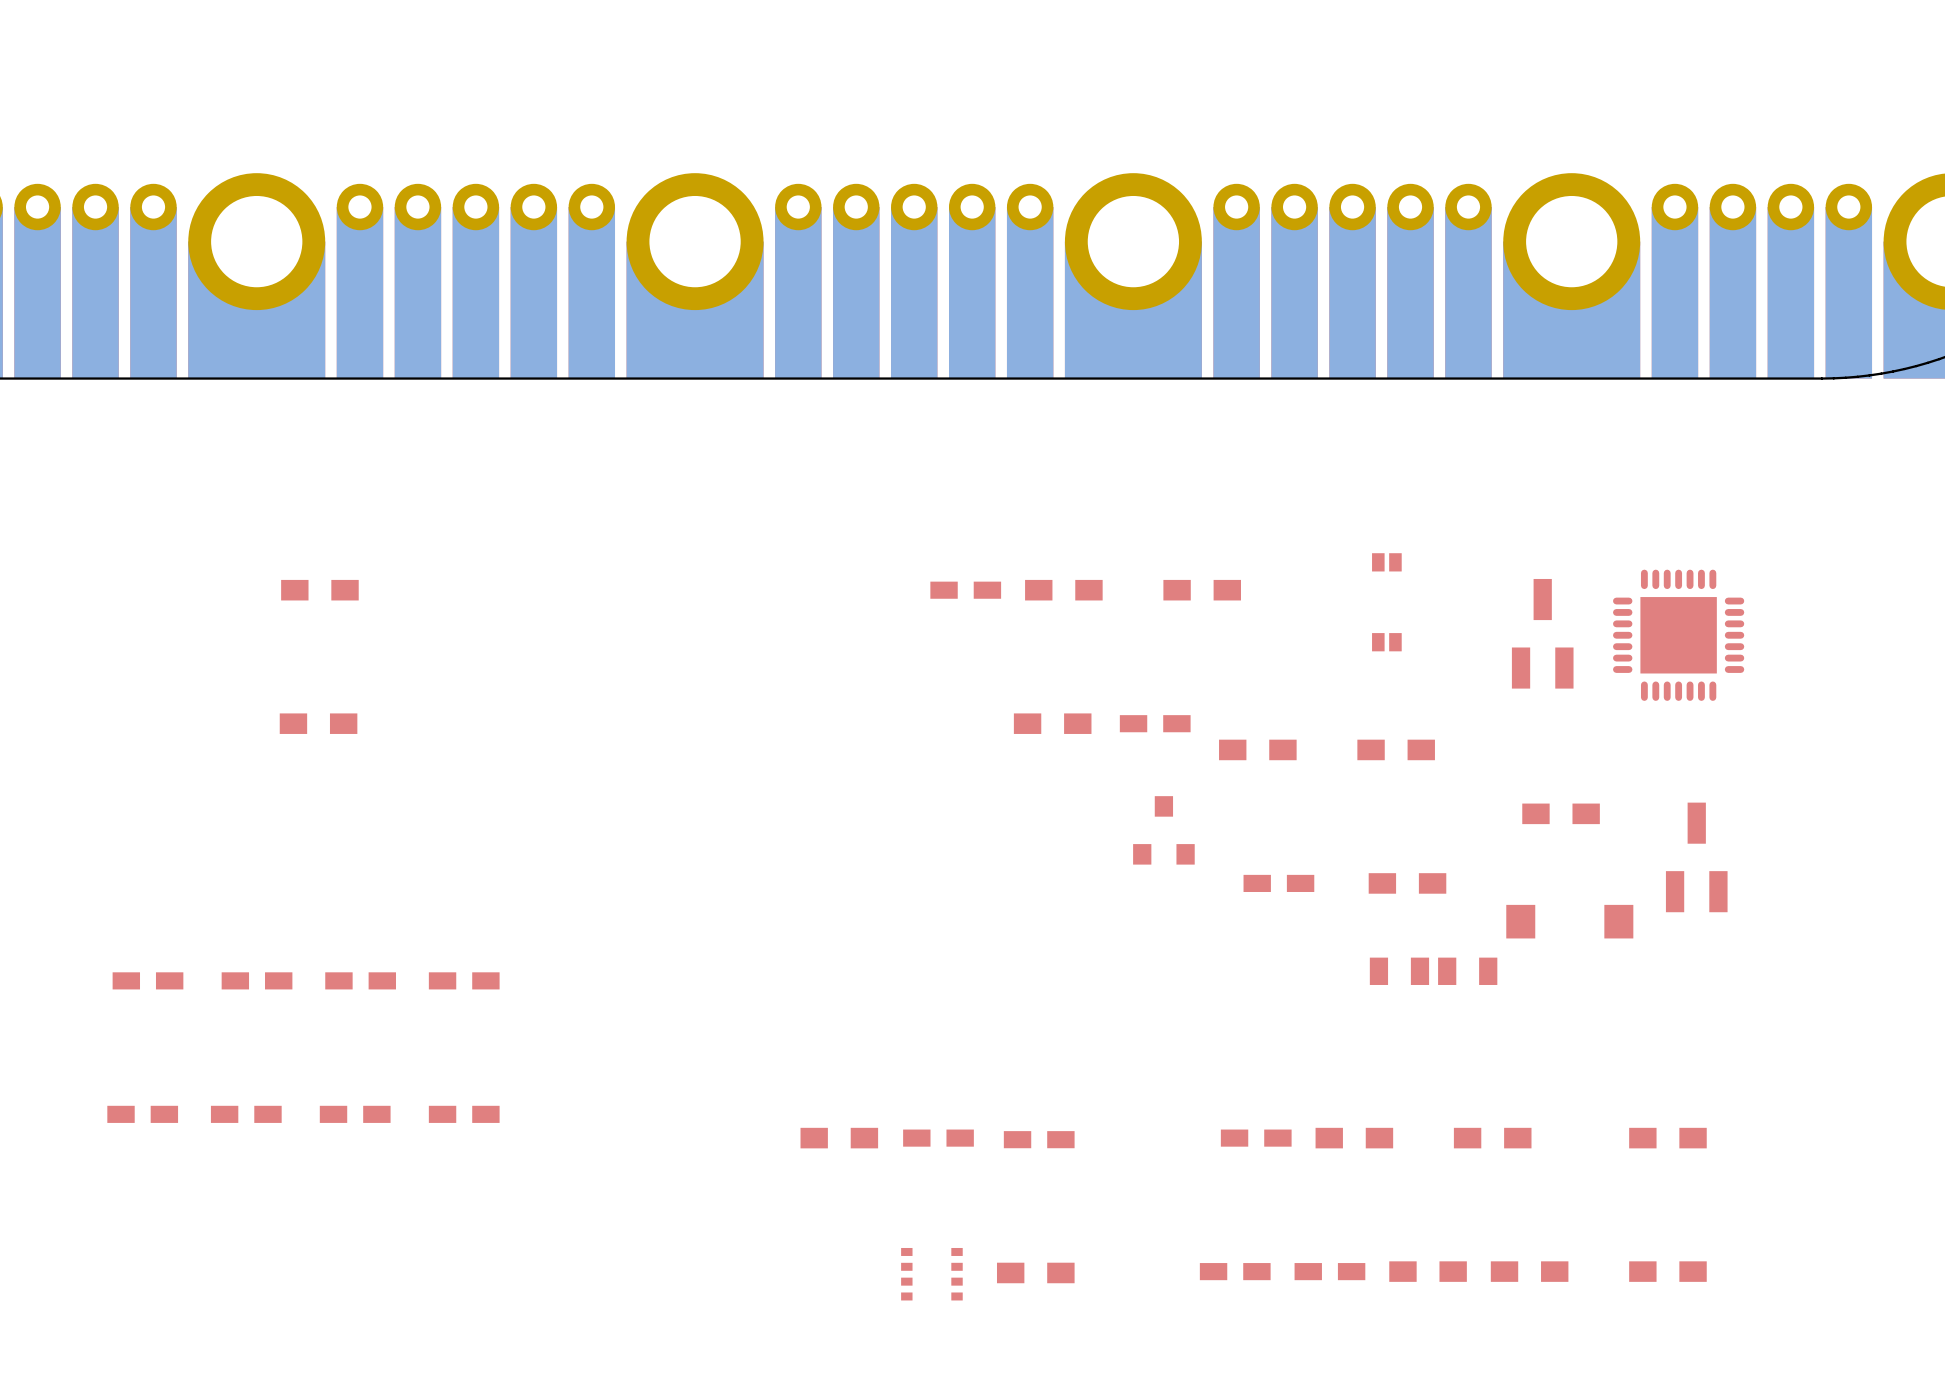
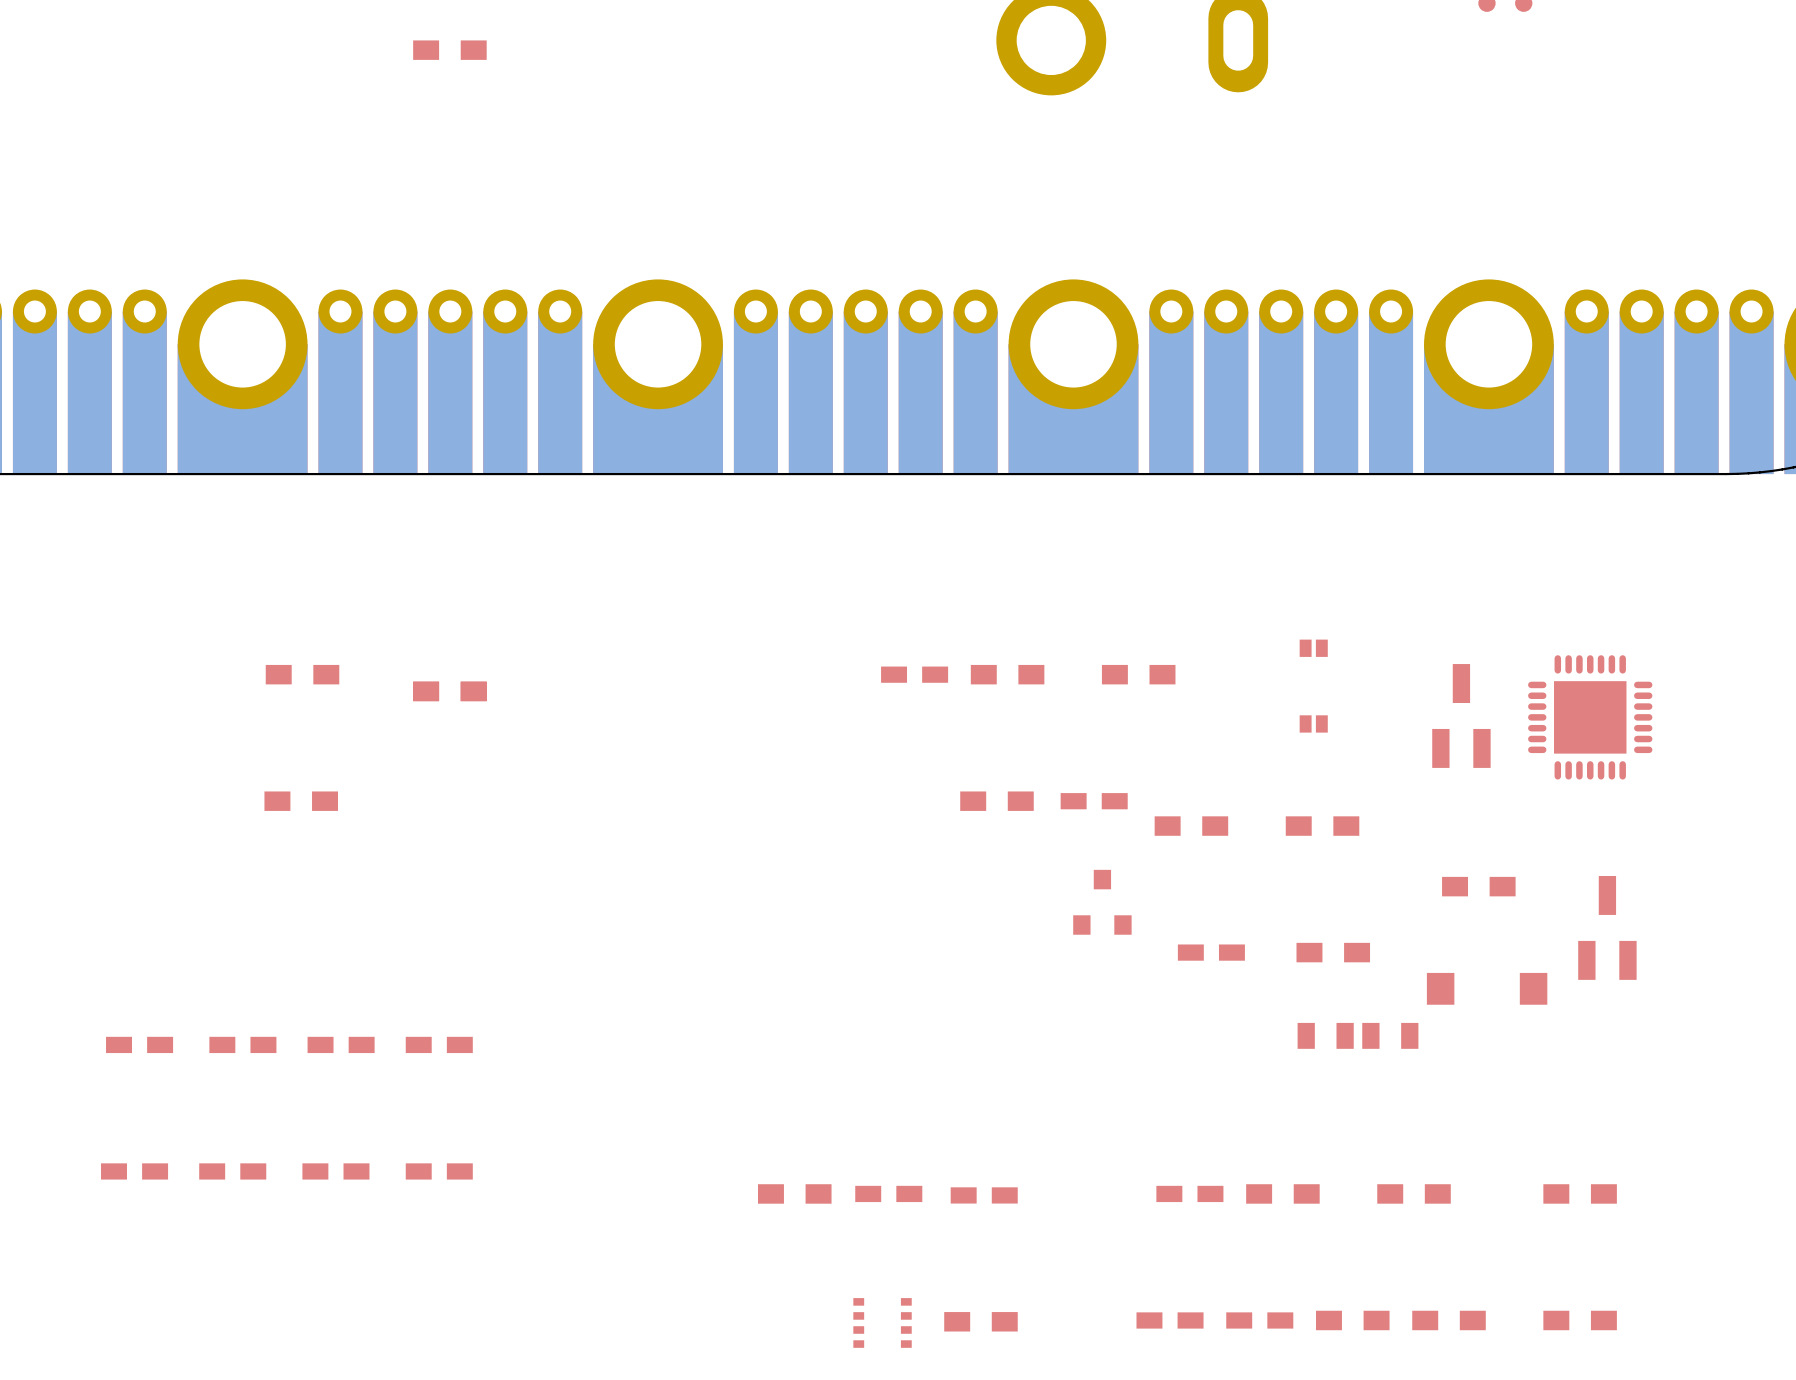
part: none -> (449, 691)

